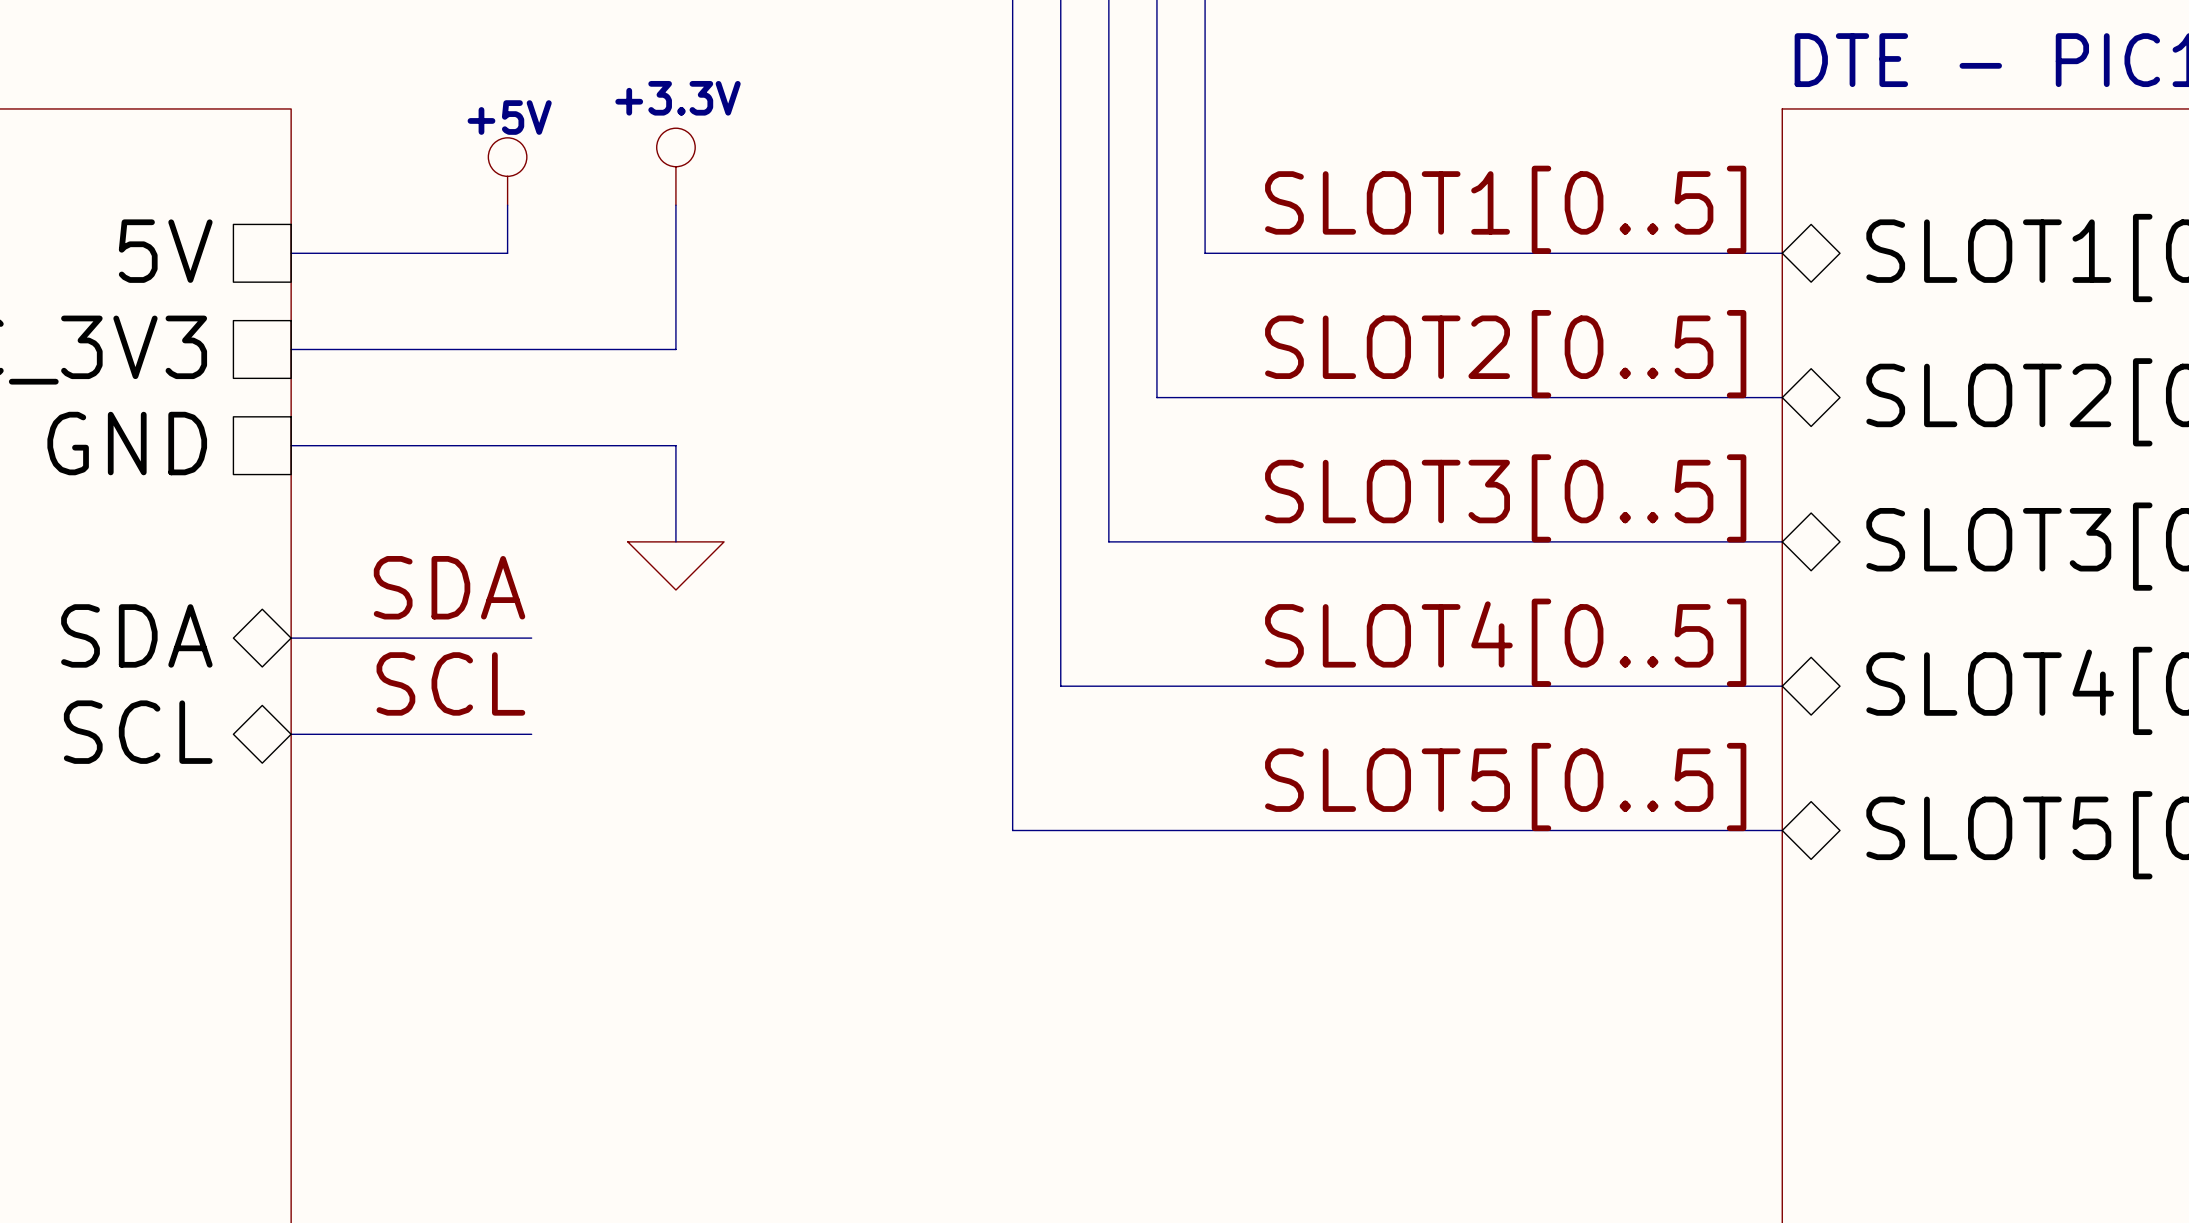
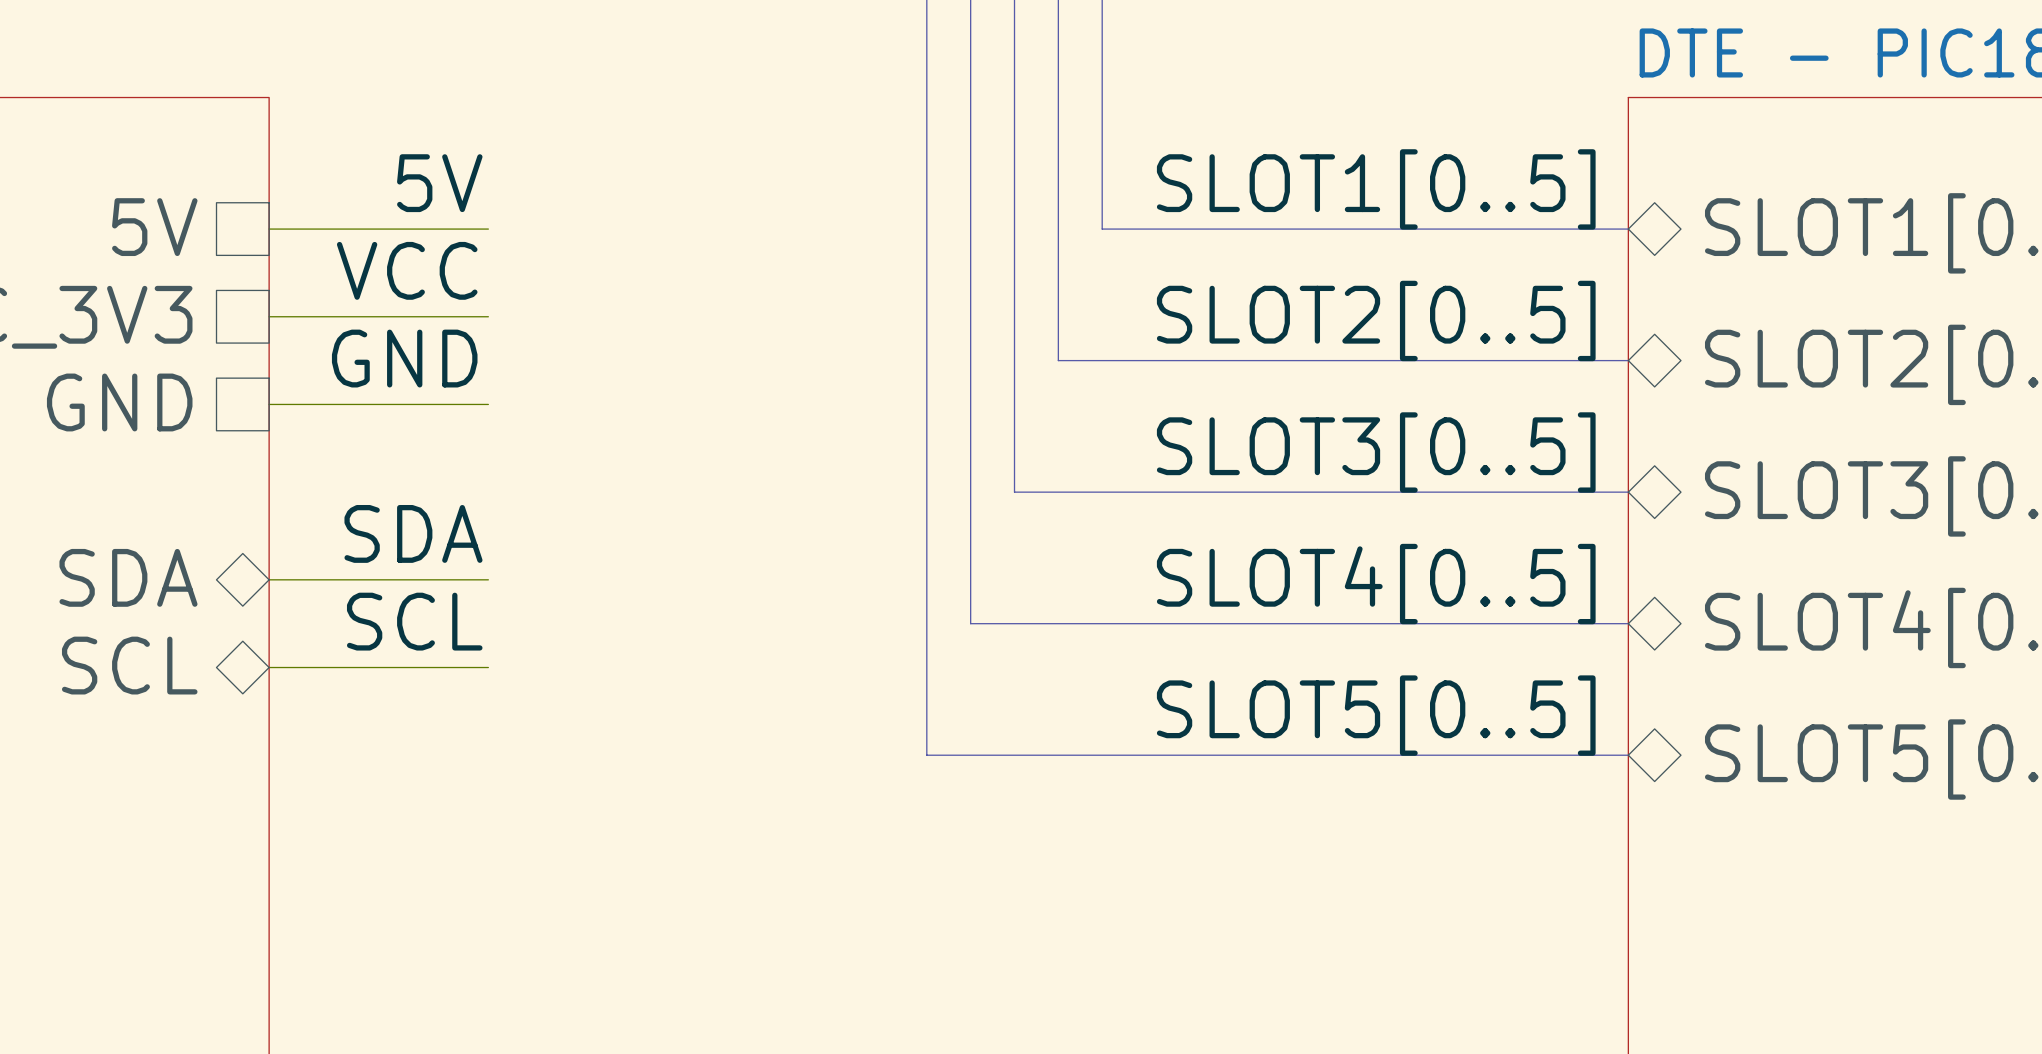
power symbol: +3.3V (675, 166) -> none
power symbol: +5V (507, 171) -> none
label: none -> 5V (439, 183)
wire: (507, 205) (507, 253) -> (488, 229) (466, 229)
wire: (675, 205) (675, 349) (531, 349) -> none
label: none -> VCC (407, 270)
label: none -> GND (404, 358)
wire: (531, 445) (675, 445) (675, 541) -> none
power symbol: (675, 565) -> none

